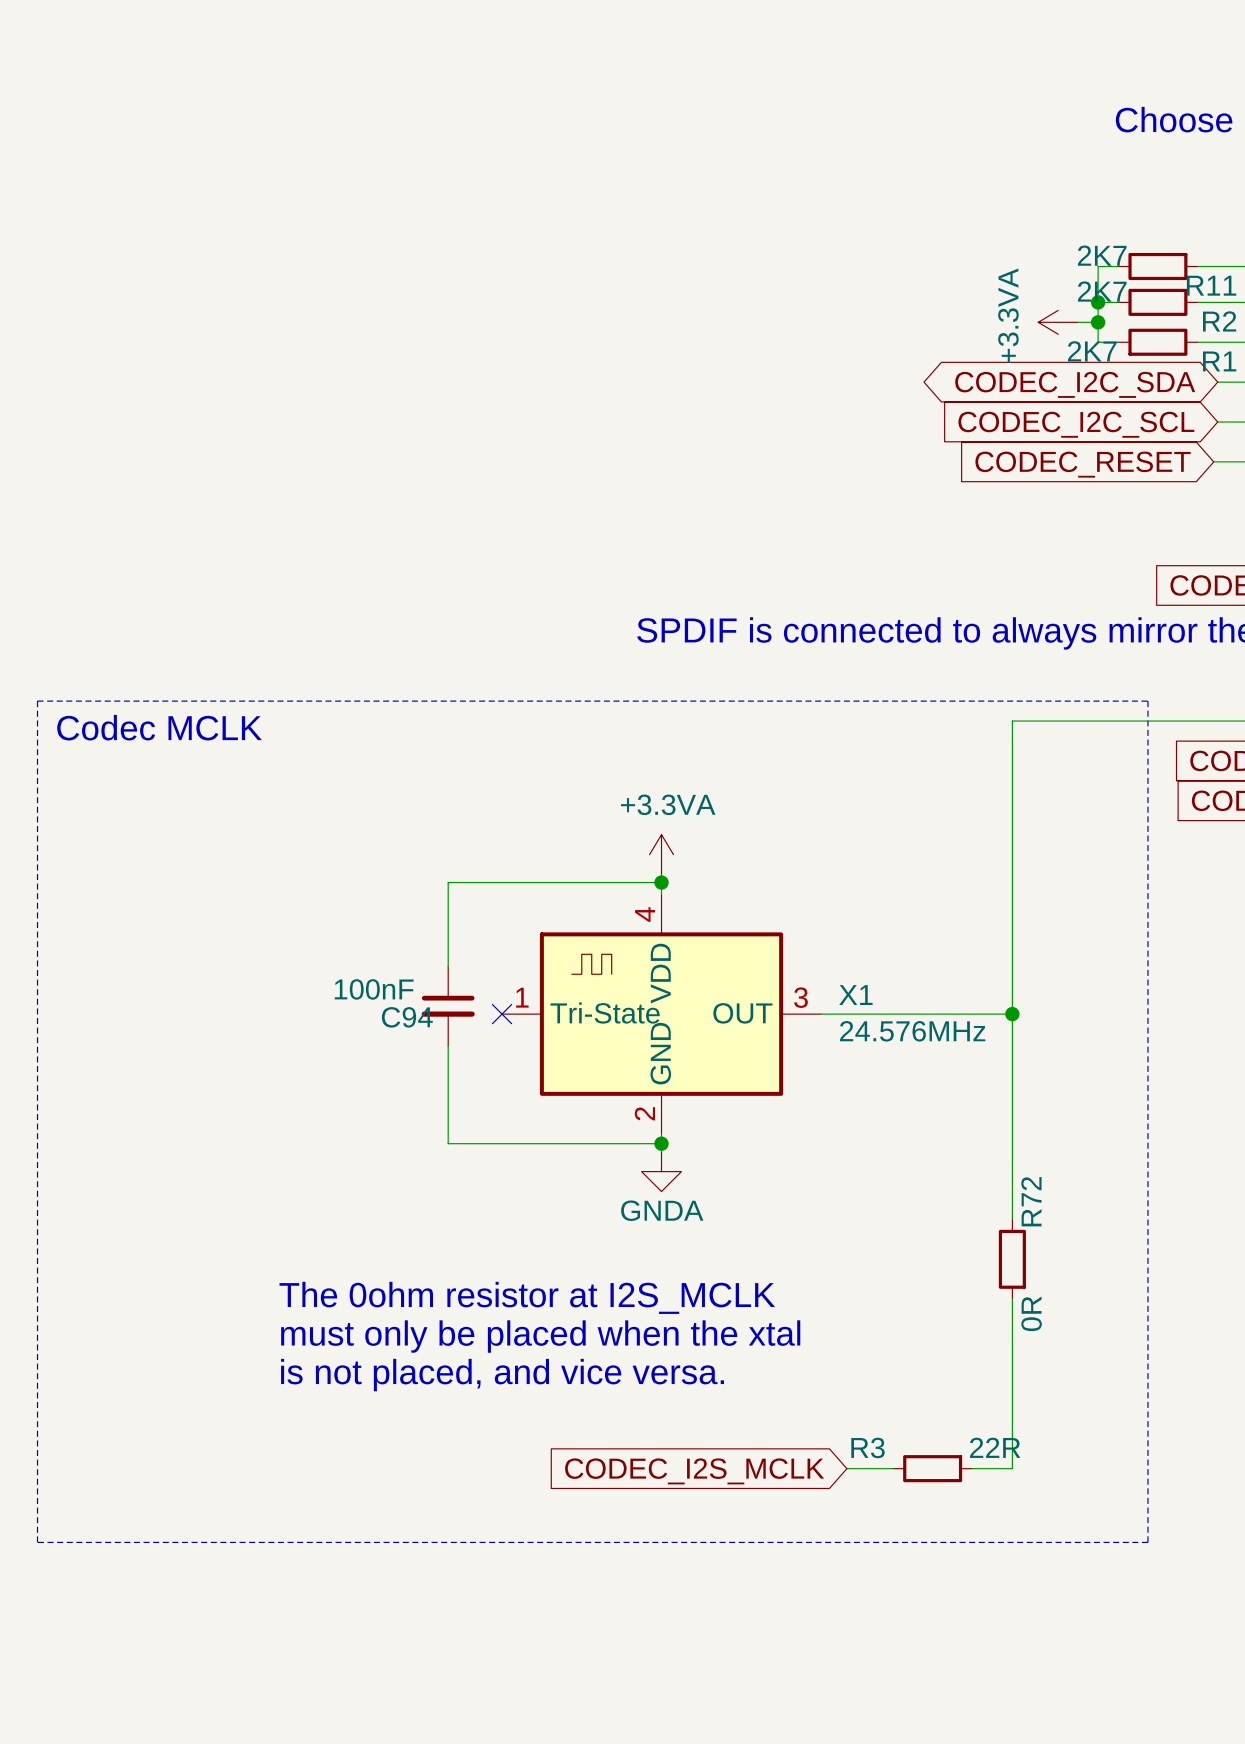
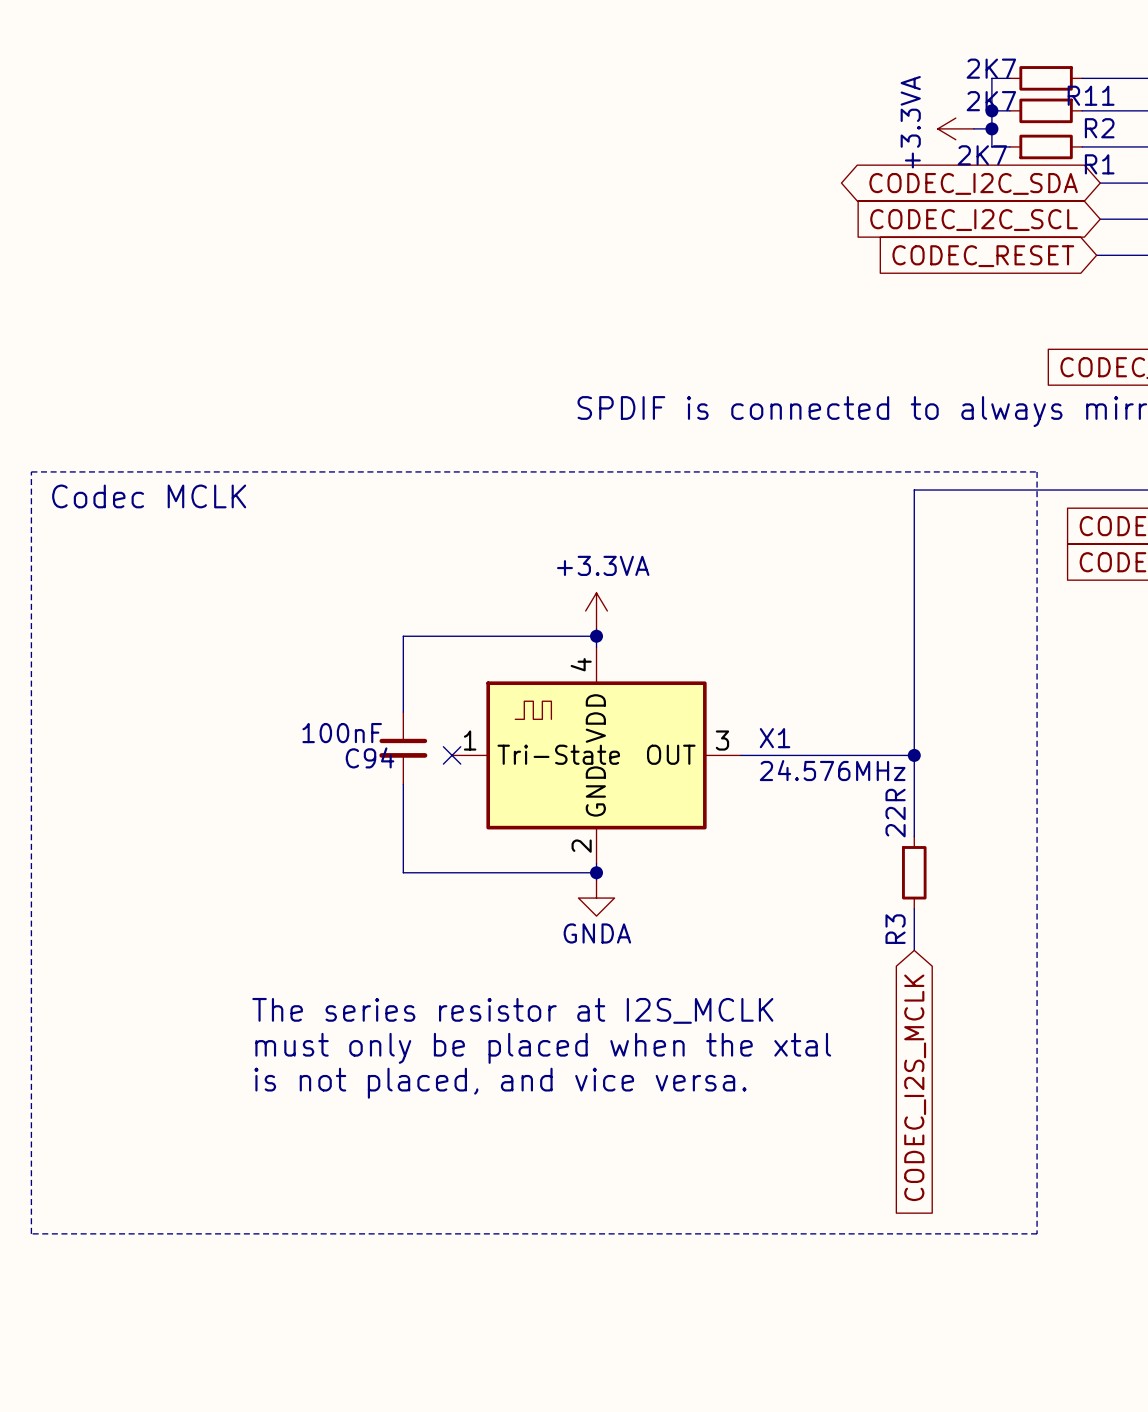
wire: (1012, 1103) (1012, 1183) -> none
R72: 0R (1012, 1259) -> none
text: The 0ohm resistor at I2S_MCLK (527, 1297) -> The series resistor at I2S_MCLK (512, 1010)
wire: (1012, 1299) (1012, 1468) (972, 1468) -> none
R3 name position: R3 (867, 1447) -> R3 (895, 929)
R3 value position: 22R (995, 1447) -> 22R (895, 813)
wire: (846, 1468) (892, 1468) -> none
R3 rotation: 0° (932, 1468) -> 90° clockwise (914, 872)
R3 position: (932, 1468) -> (914, 872)
global label rotation: 0° (694, 1471) -> 90° counterclockwise (915, 1087)
global label position: CODEC_I2S_MCLK (694, 1471) -> CODEC_I2S_MCLK (915, 1087)

